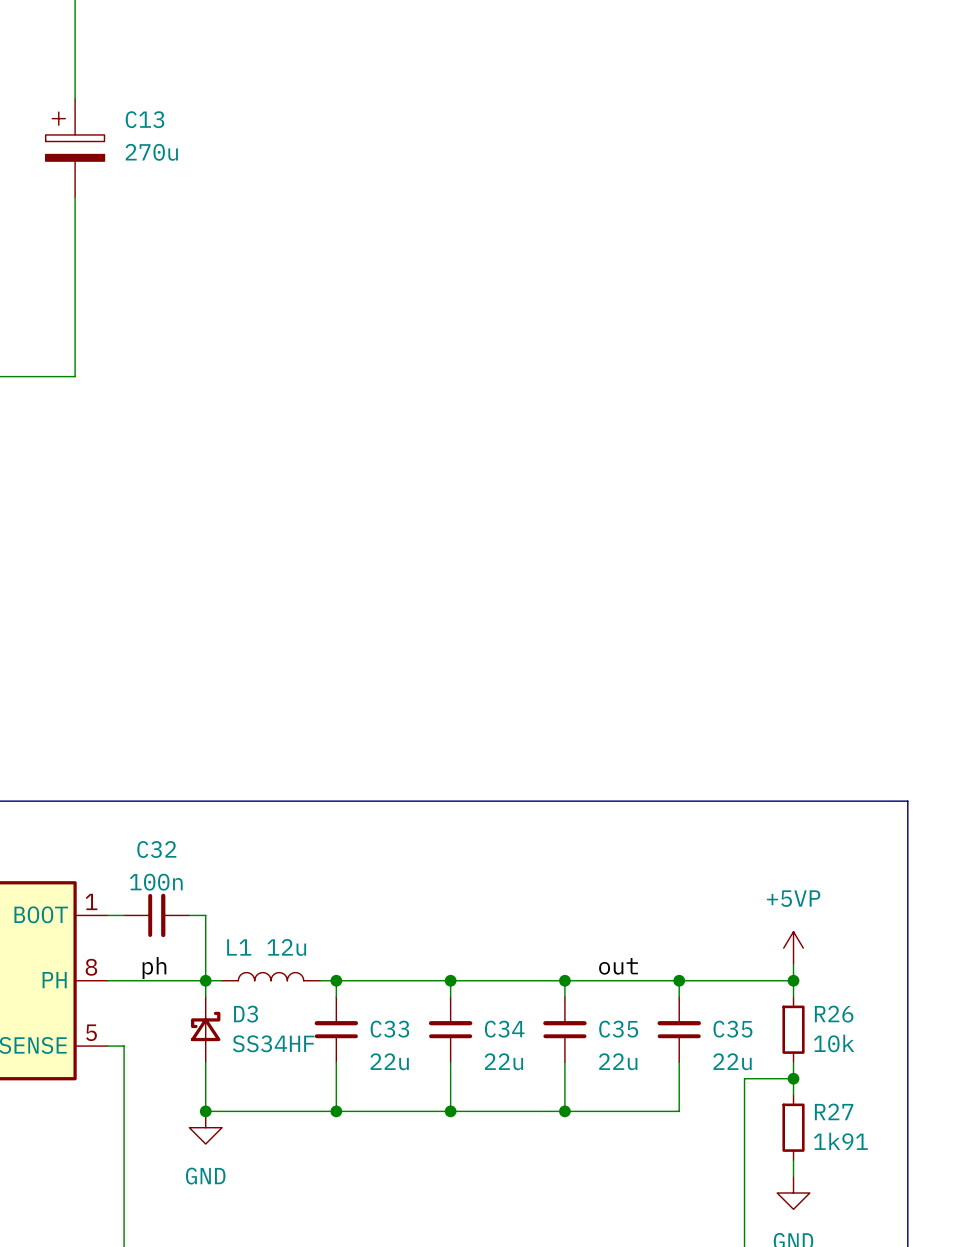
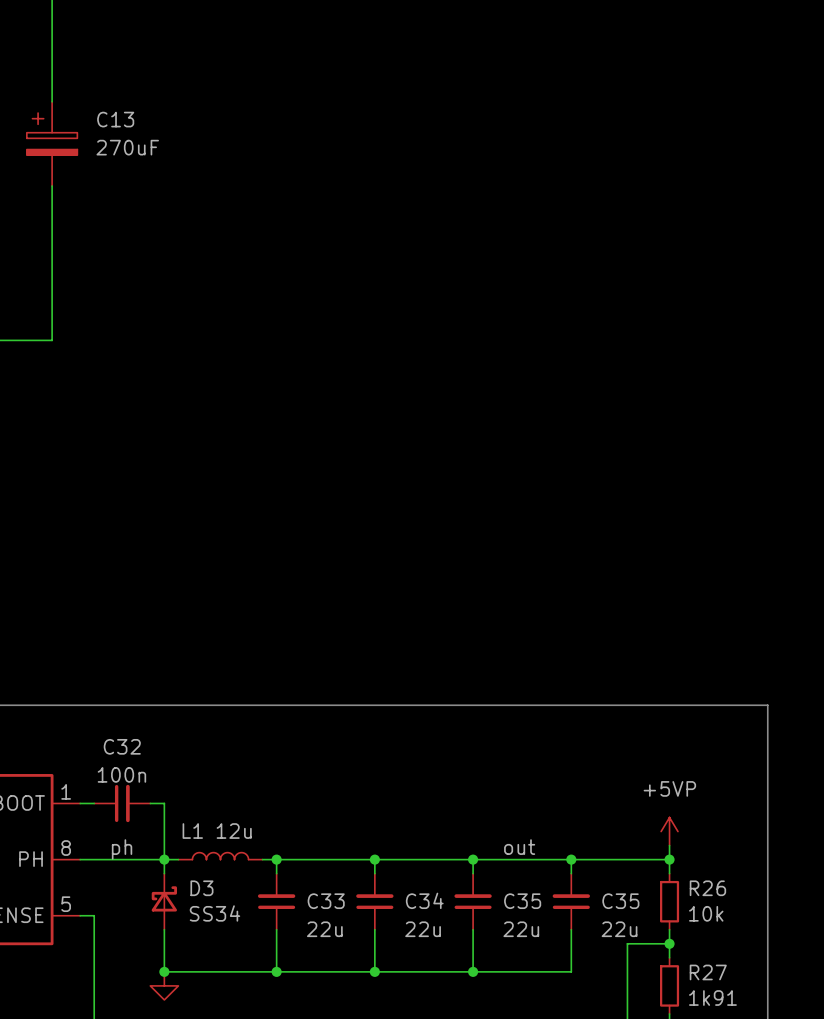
C13 value: 270u (151, 152) -> 270uF (127, 147)
D3 value: SS34HF (273, 1043) -> SS34 (214, 913)

